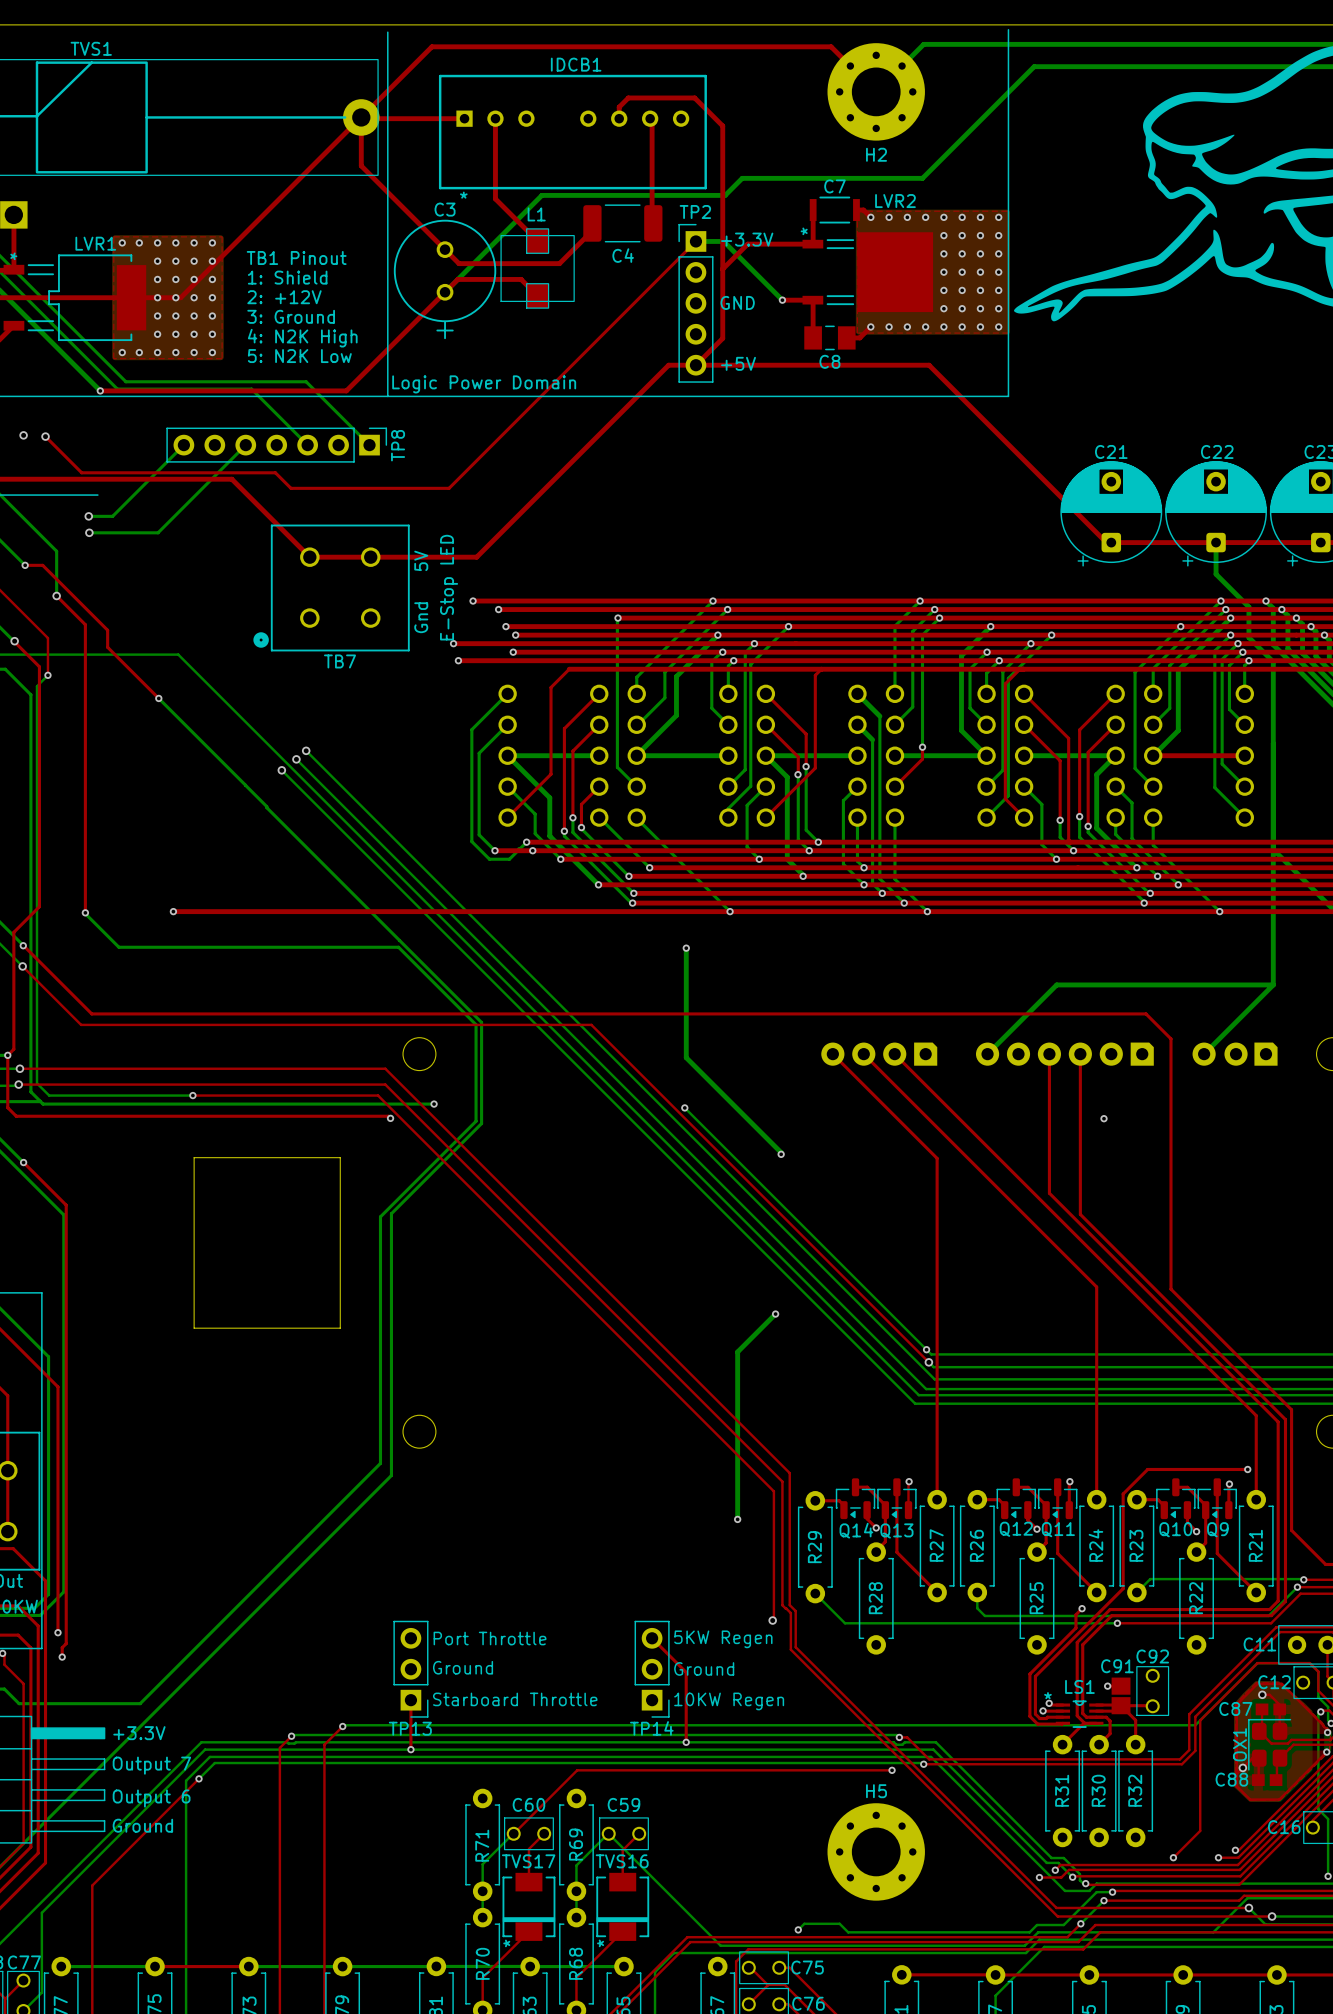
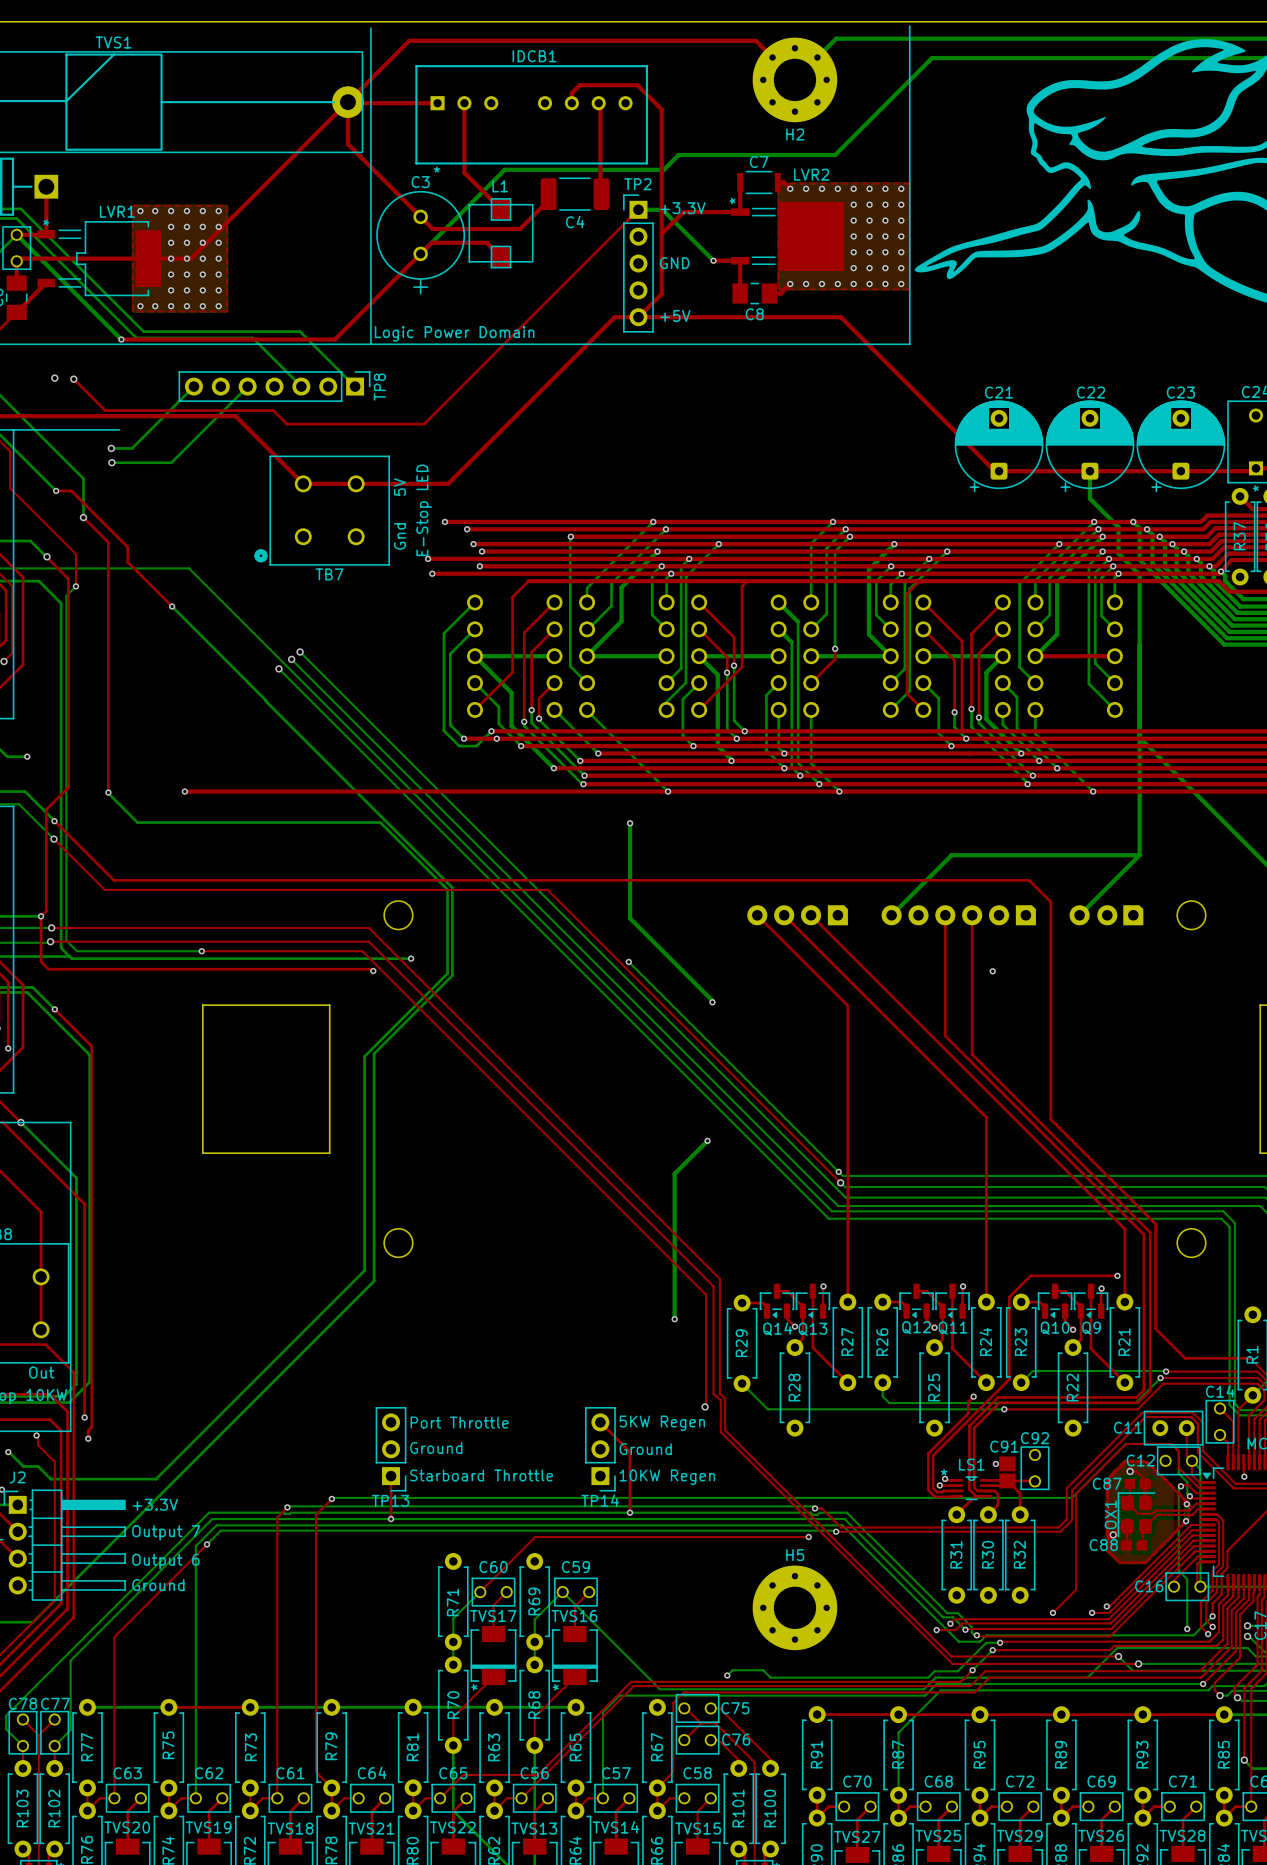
text: TB1 Pinout (296, 257) -> none
text: 1: Shield (287, 277) -> none
text: 2: +12V (284, 297) -> none
text: 3: Ground (291, 316) -> none
text: 4: N2K High (302, 338) -> none
text: 5: N2K Low (299, 356) -> none

